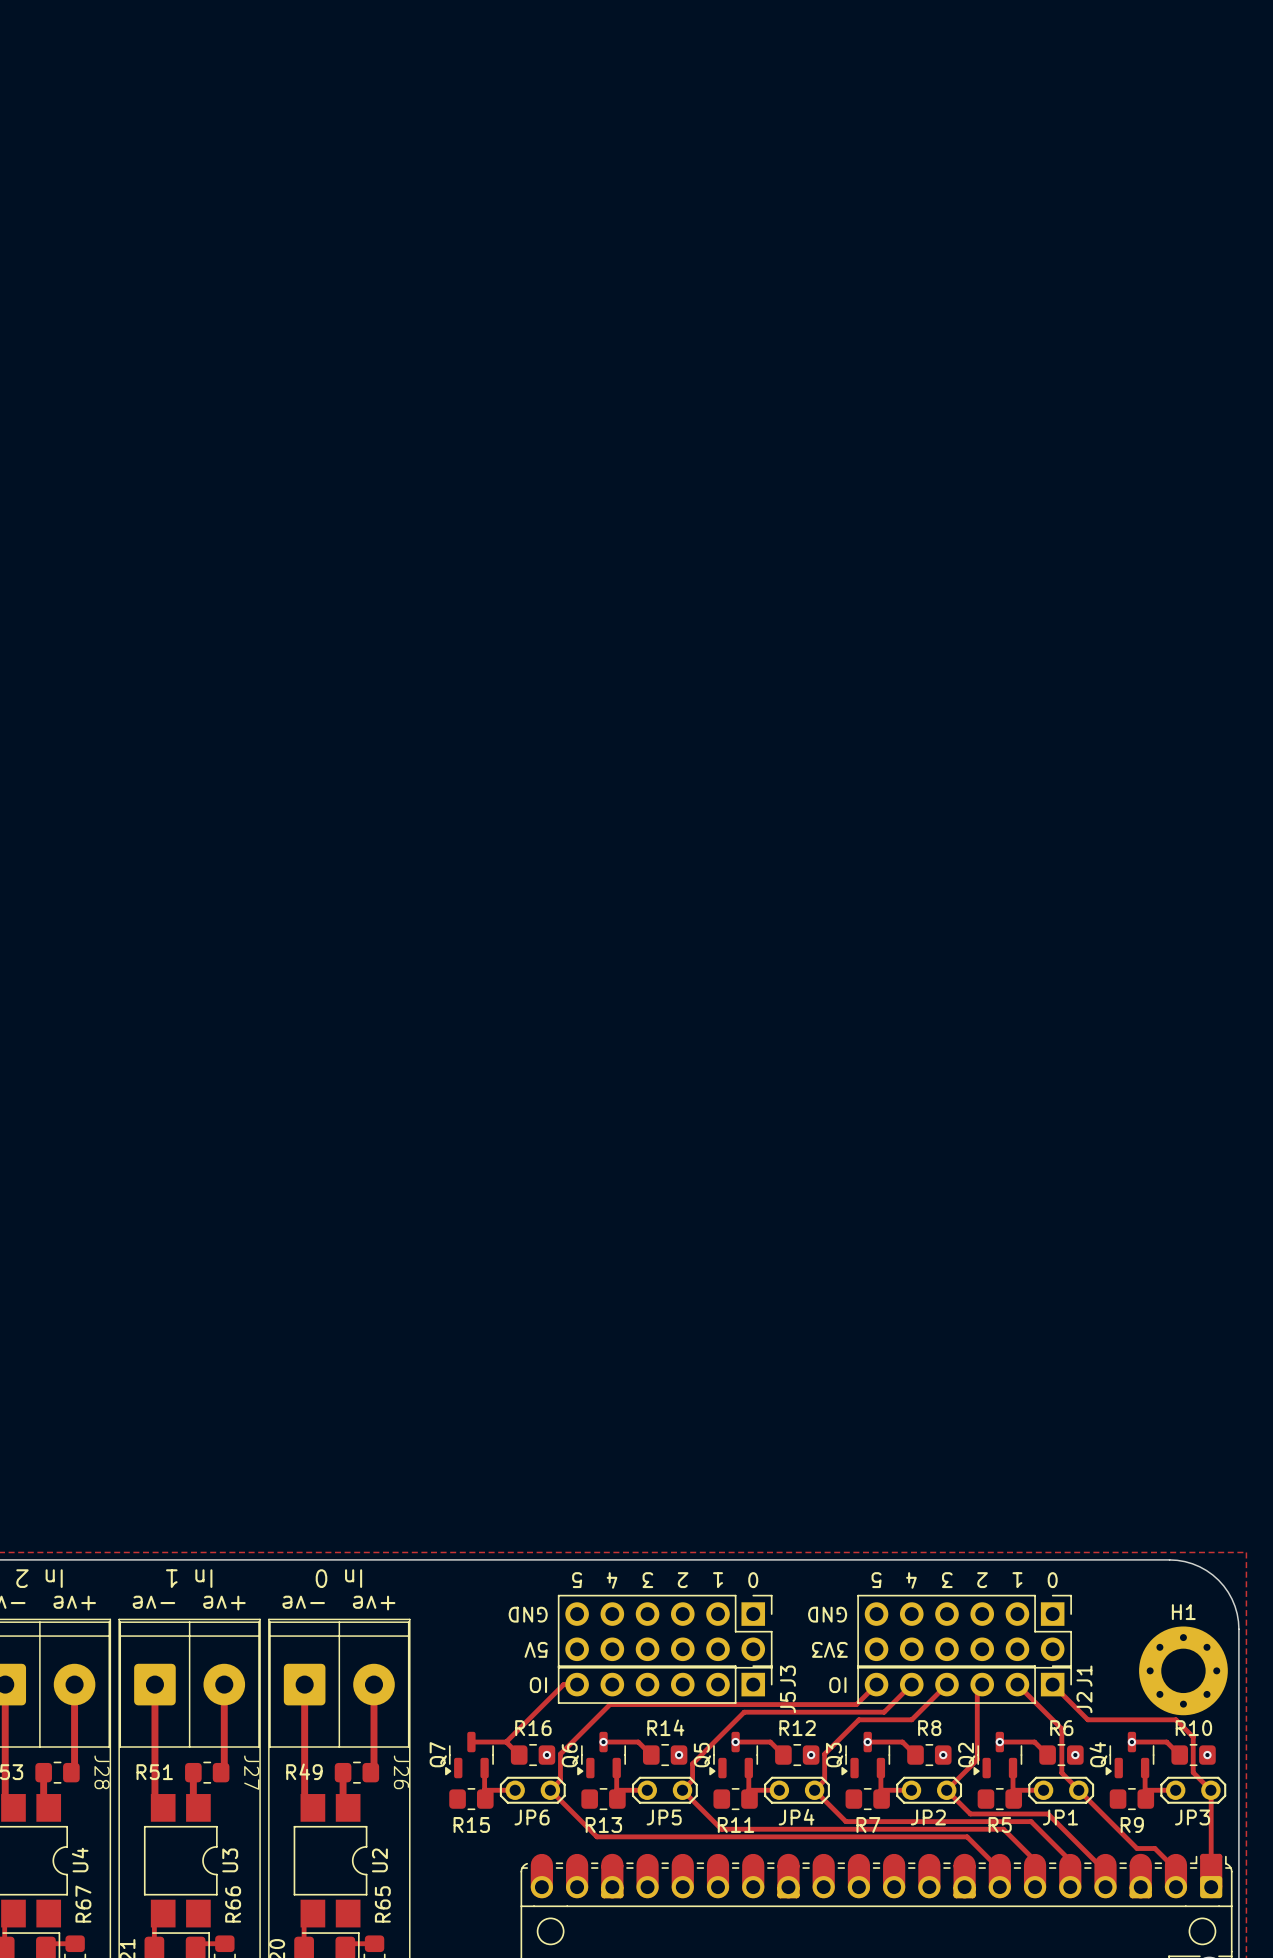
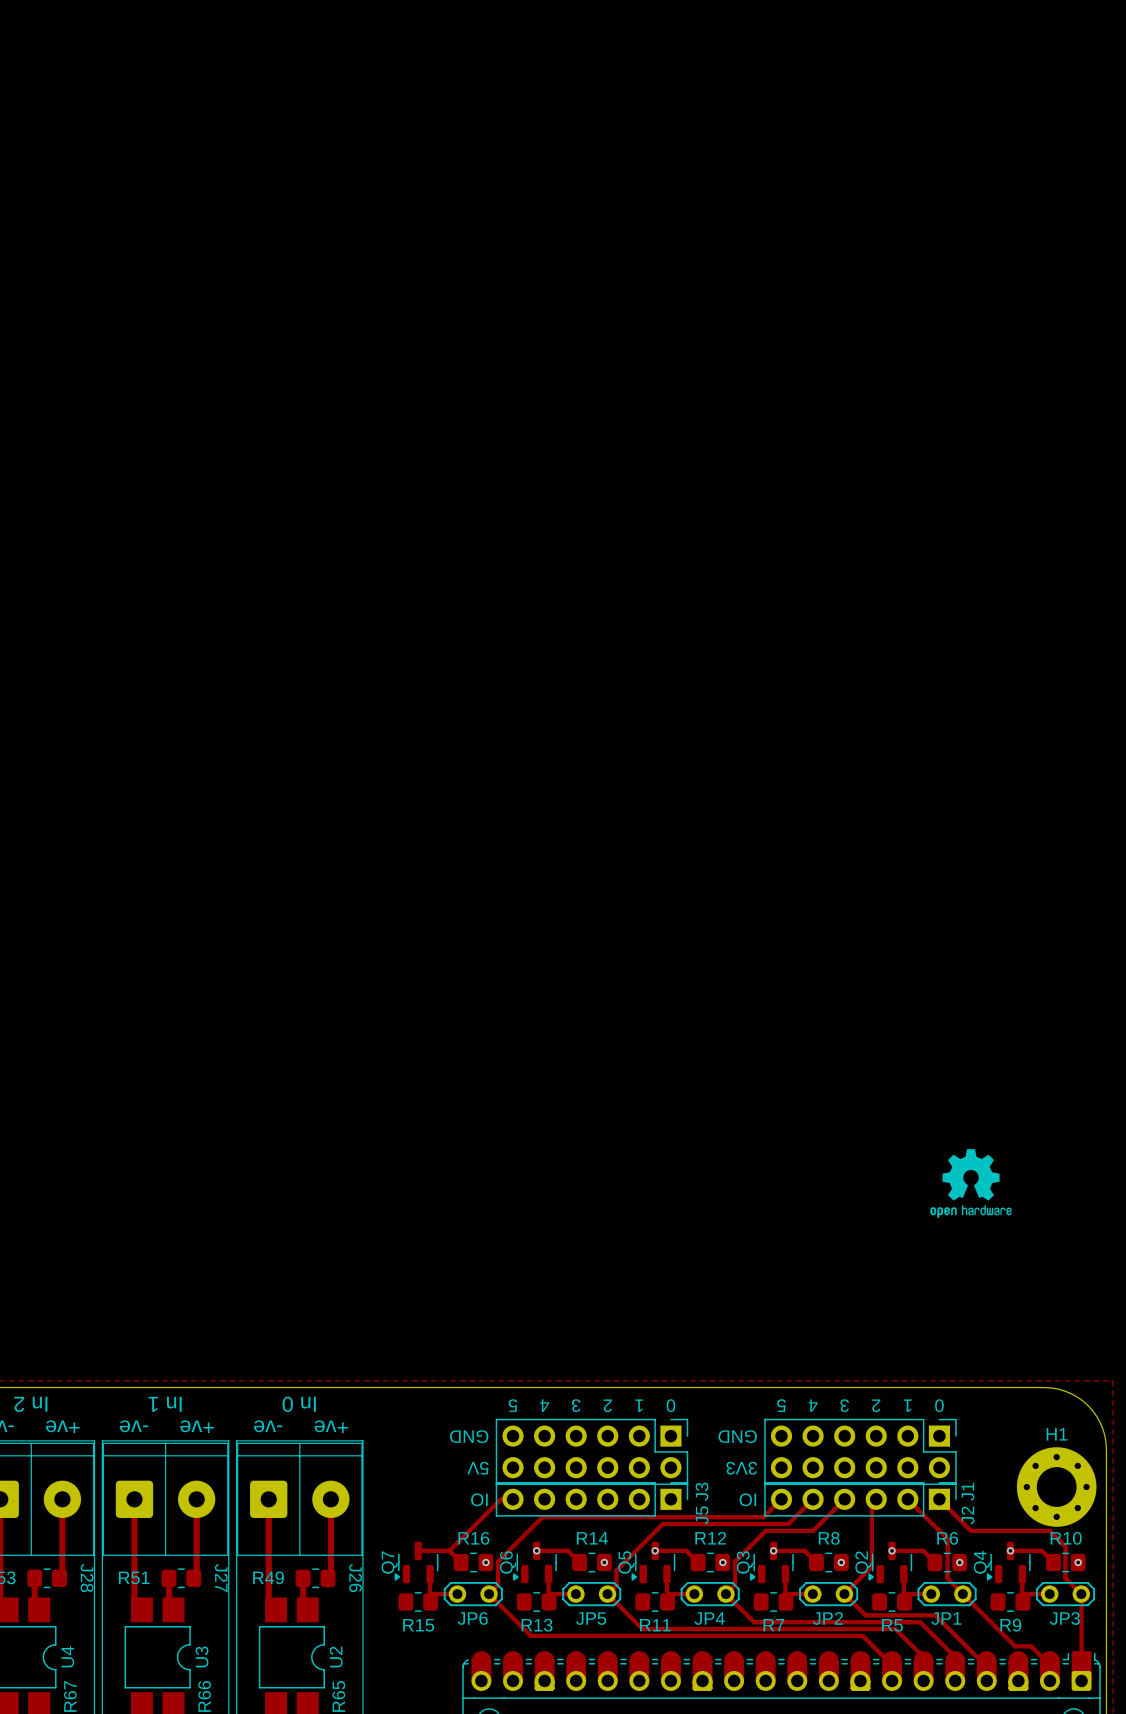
drawing: none -> [930, 1149, 1012, 1218]

